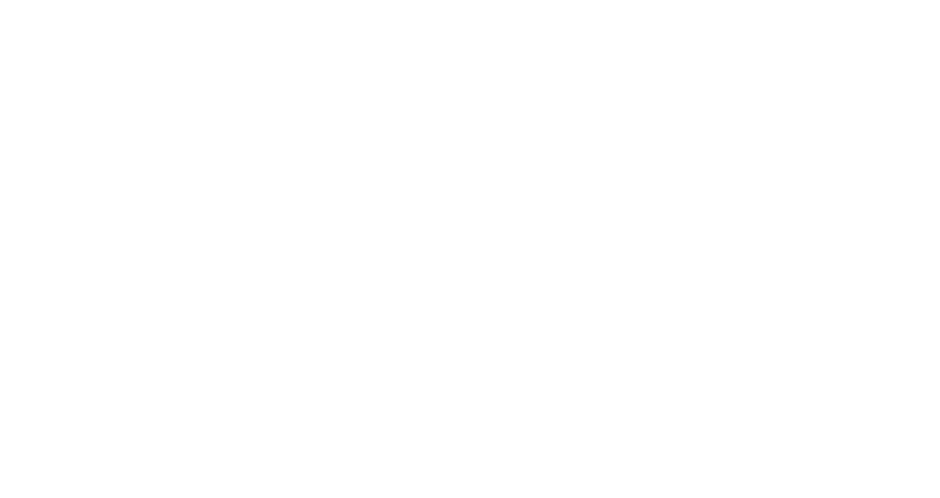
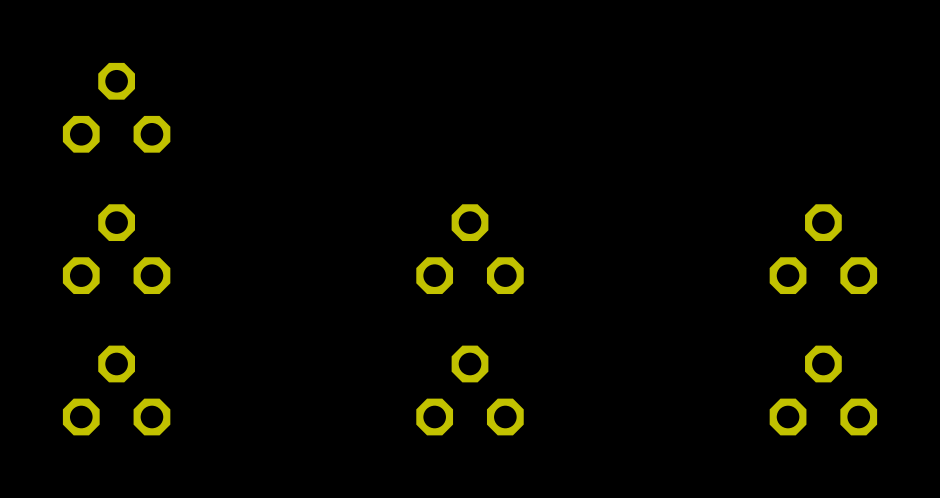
part: none -> (116, 107)
part: none -> (116, 249)
part: none -> (470, 249)
part: none -> (823, 249)
part: none -> (116, 390)
part: none -> (470, 390)
part: none -> (823, 390)

